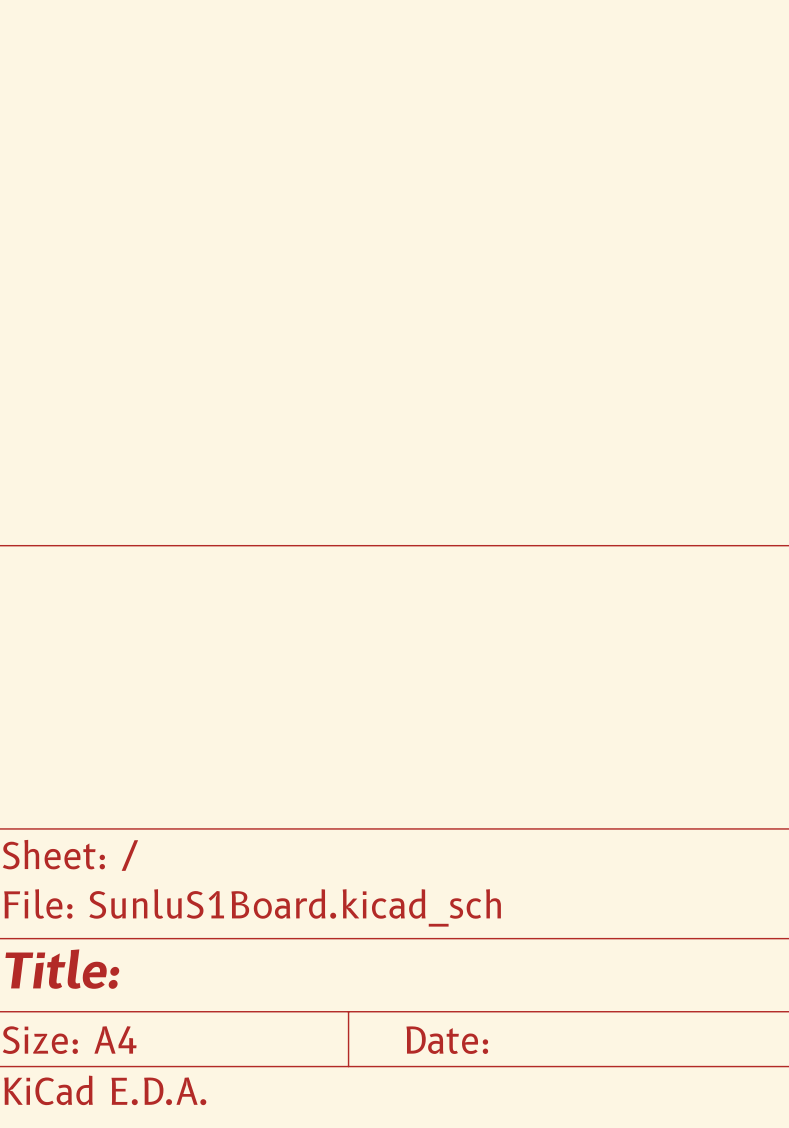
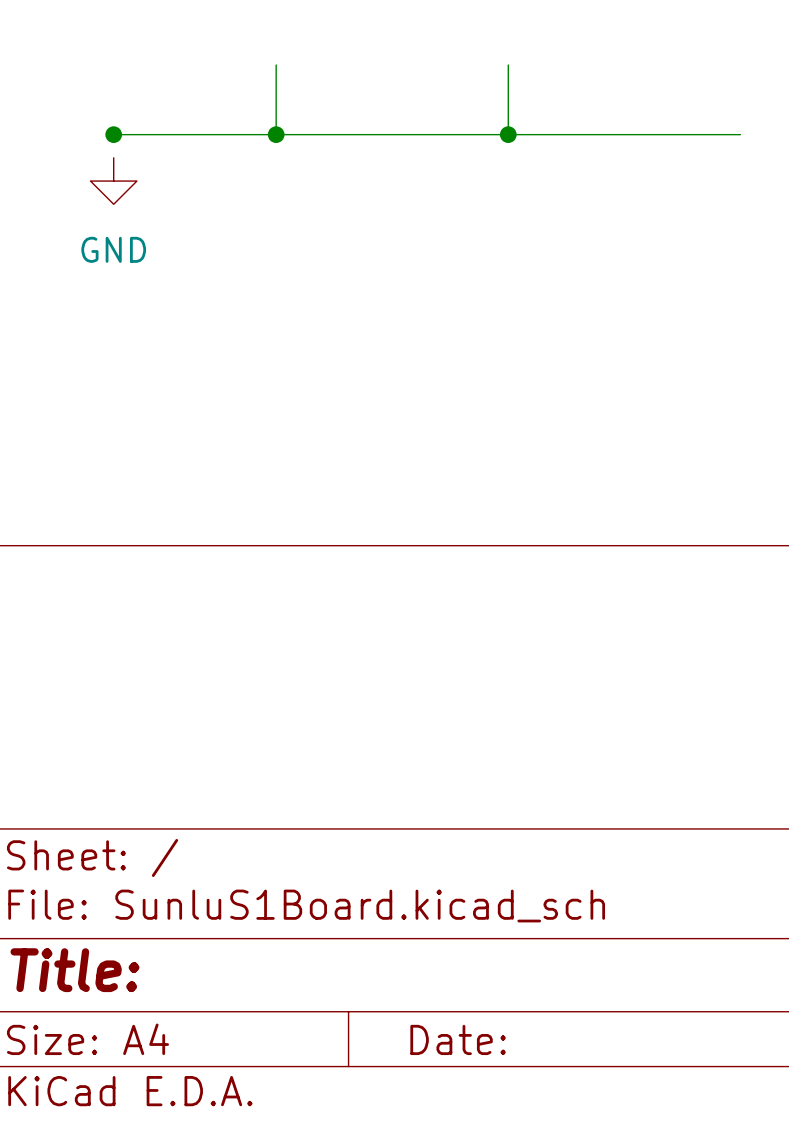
wire: none -> (276, 65) (276, 134)
wire: none -> (508, 65) (508, 134)
wire: none -> (113, 134) (740, 134)
junction: none -> (113, 134)
junction: none -> (276, 134)
junction: none -> (508, 134)
power symbol: none -> GND (113, 181)

